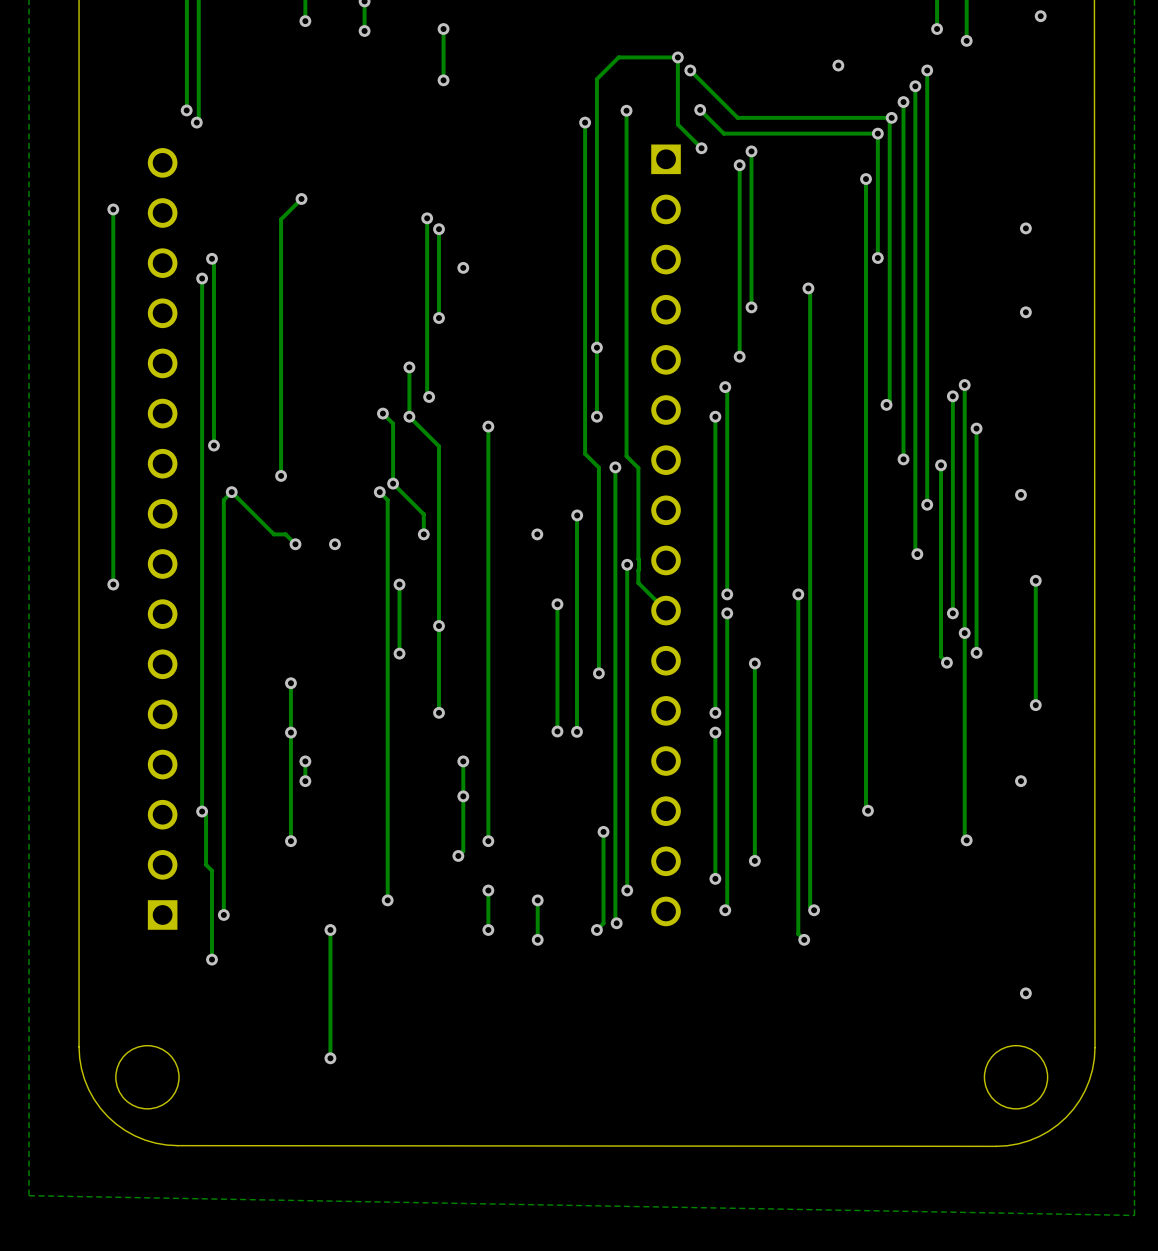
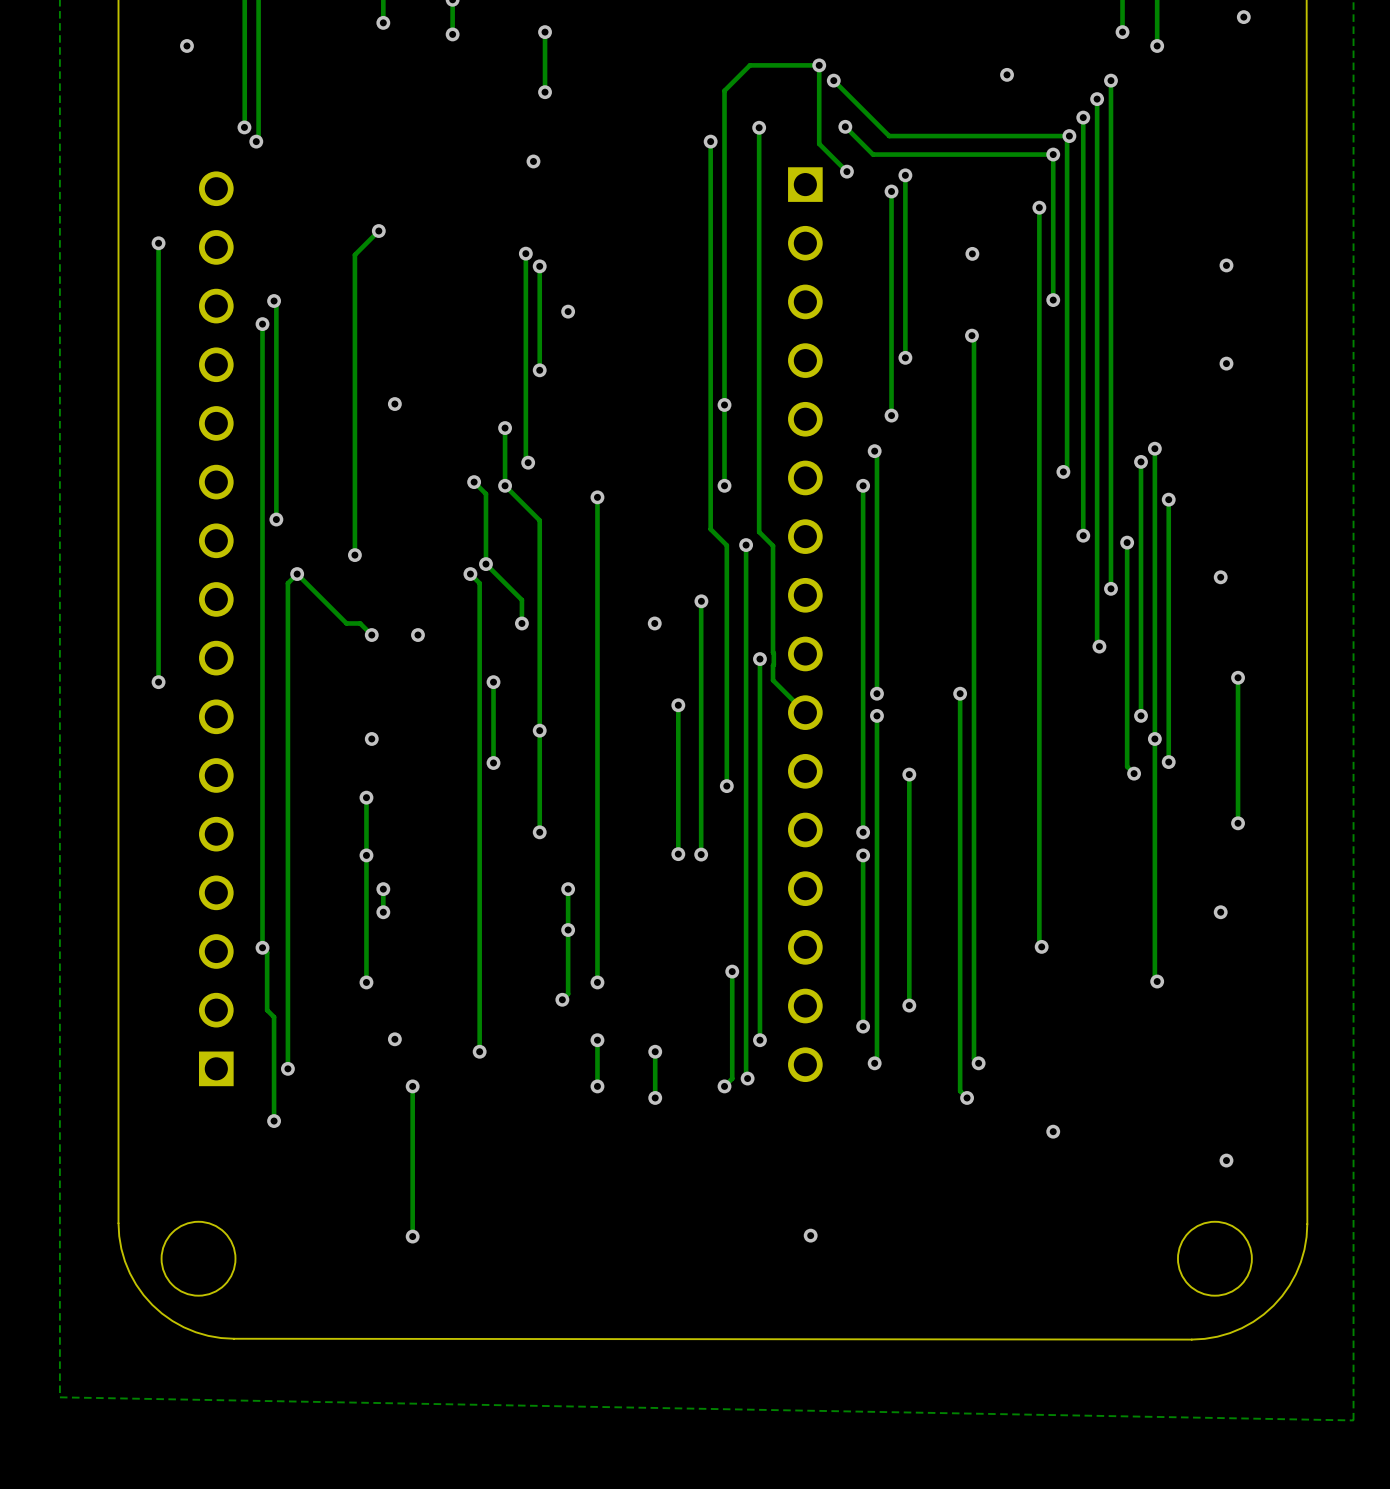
via: none -> (186, 45)
via: none -> (533, 161)
via: none -> (972, 253)
via: none -> (394, 404)
via: none -> (371, 738)
via: none -> (394, 1039)
via: none -> (1053, 1131)
via: none -> (810, 1235)

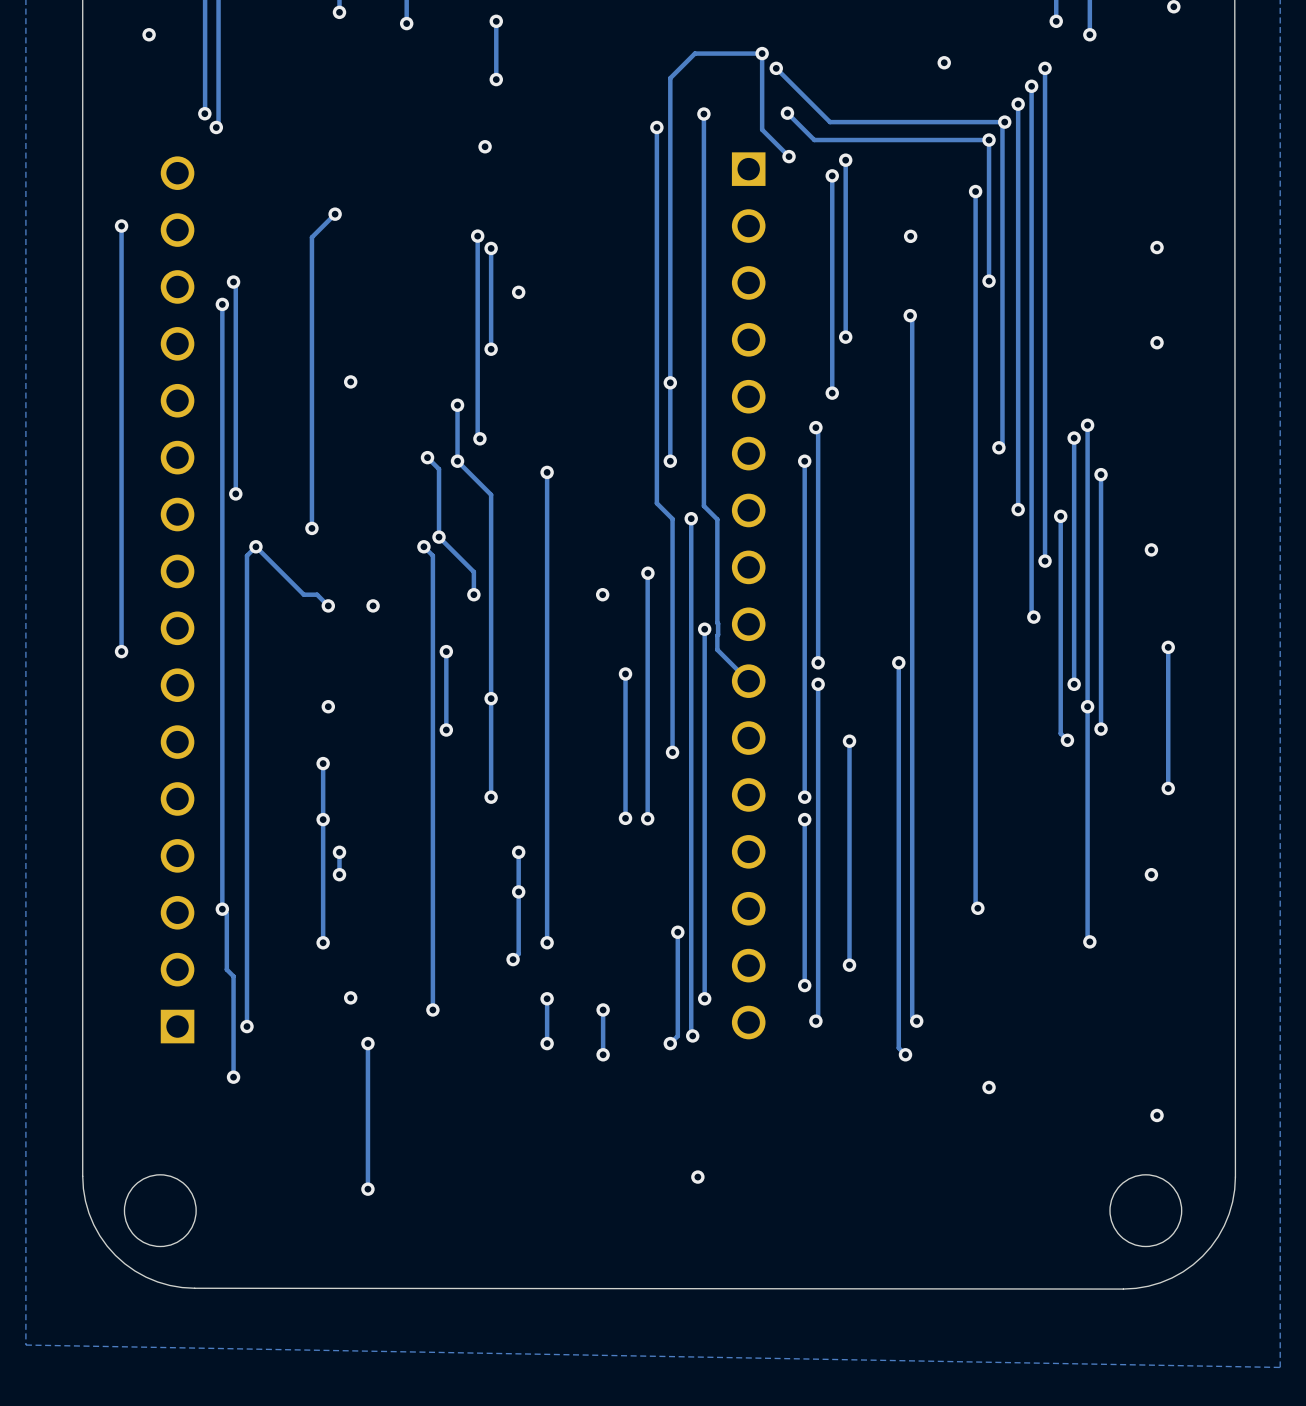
via position: (810, 1235) -> (697, 1177)

